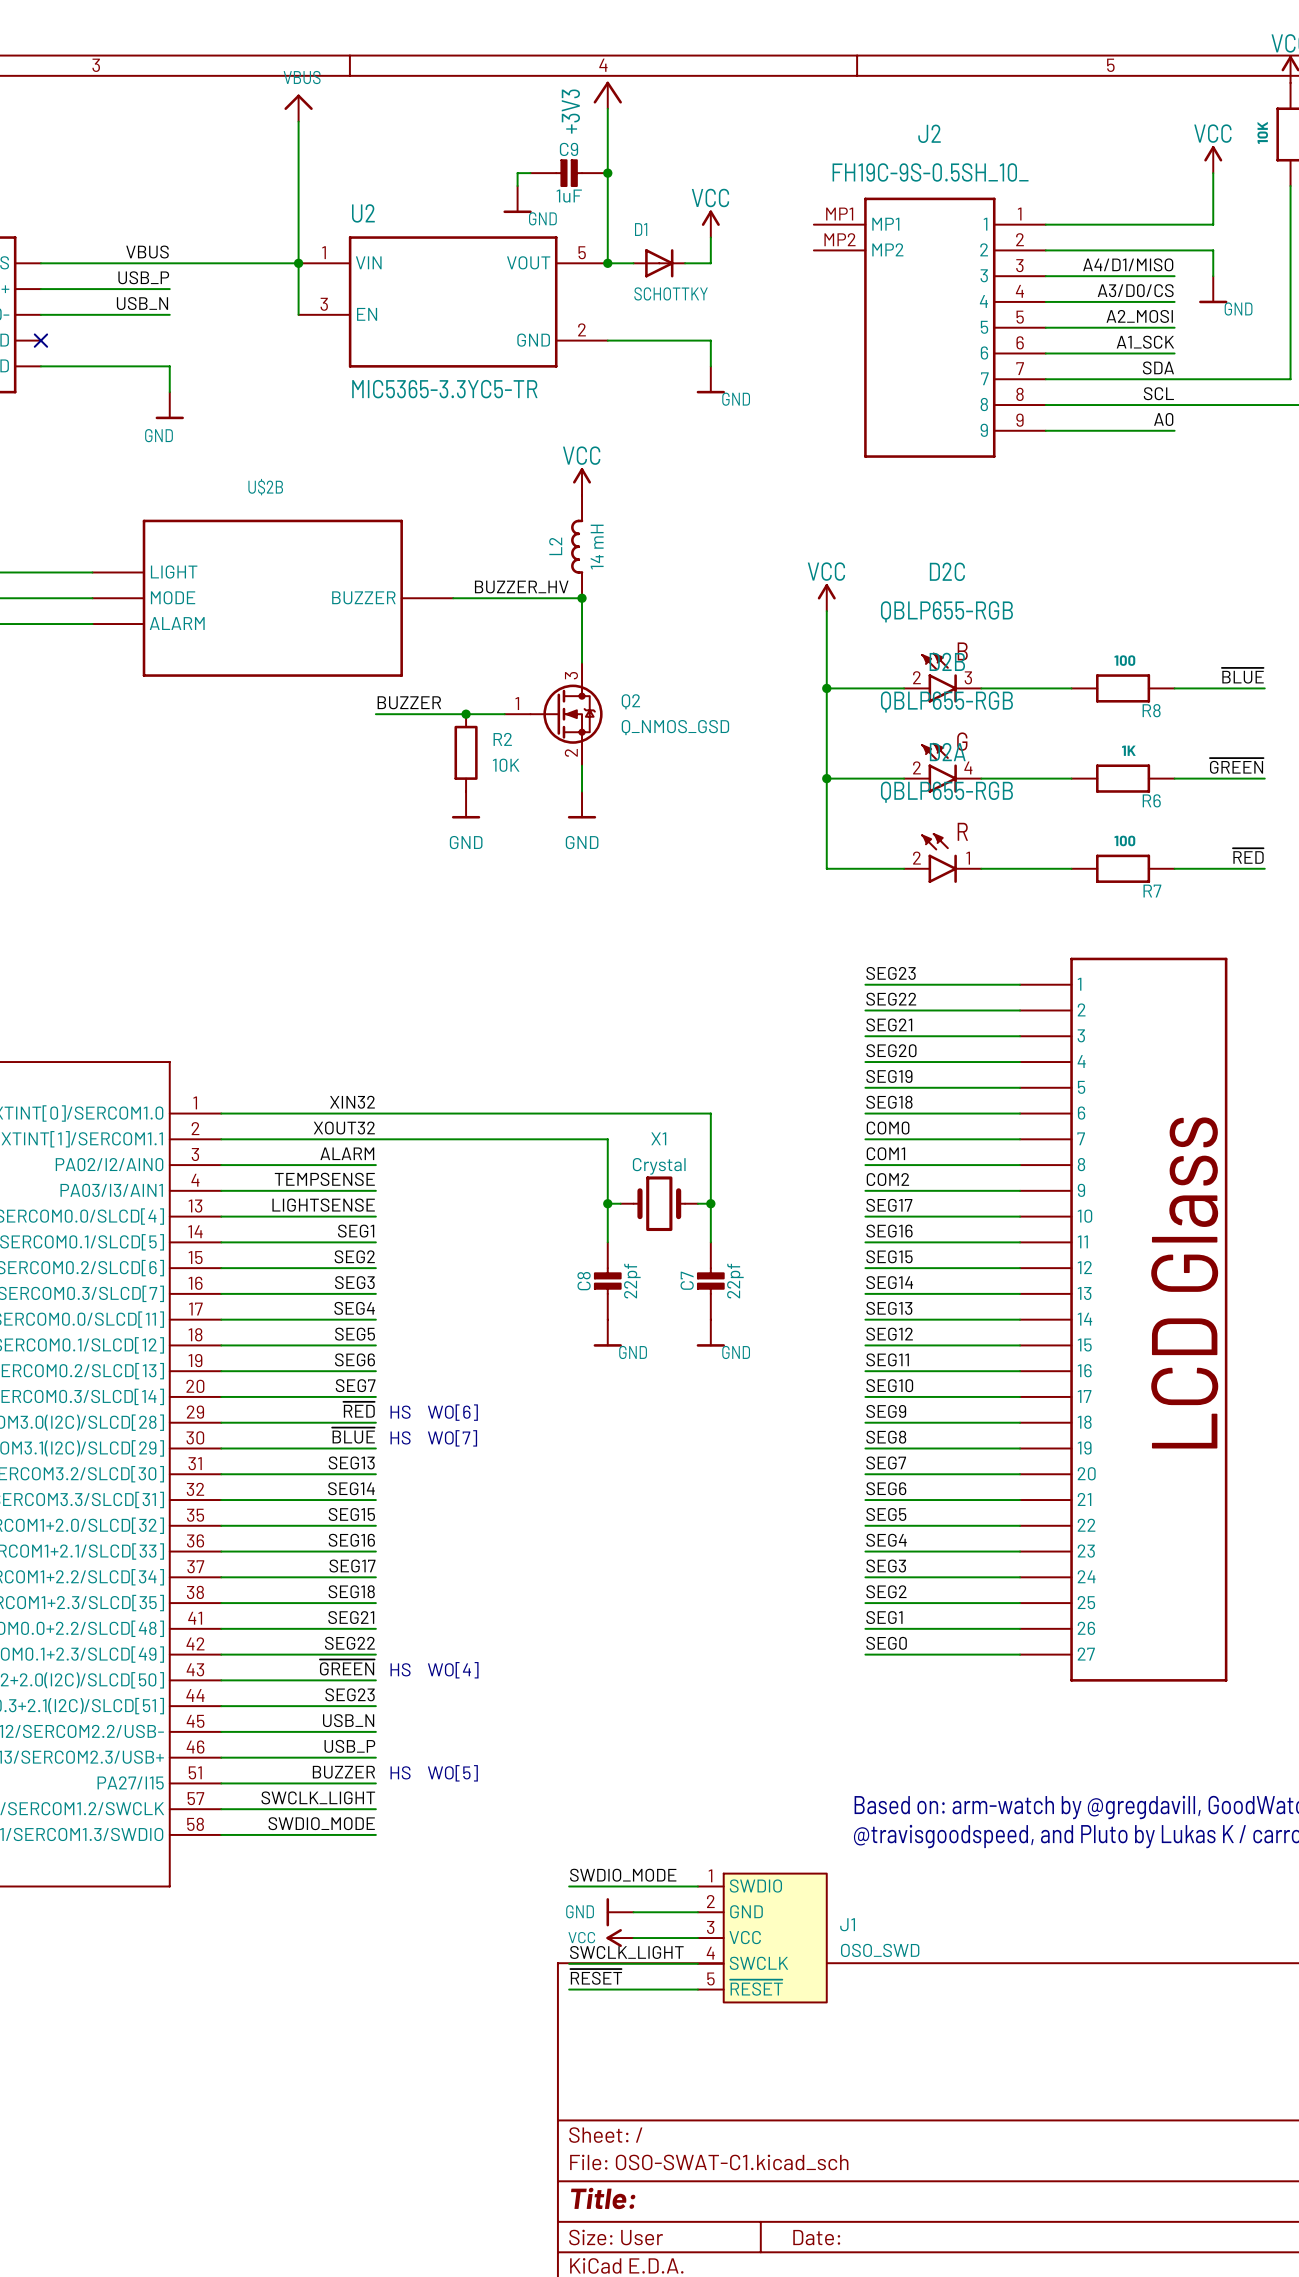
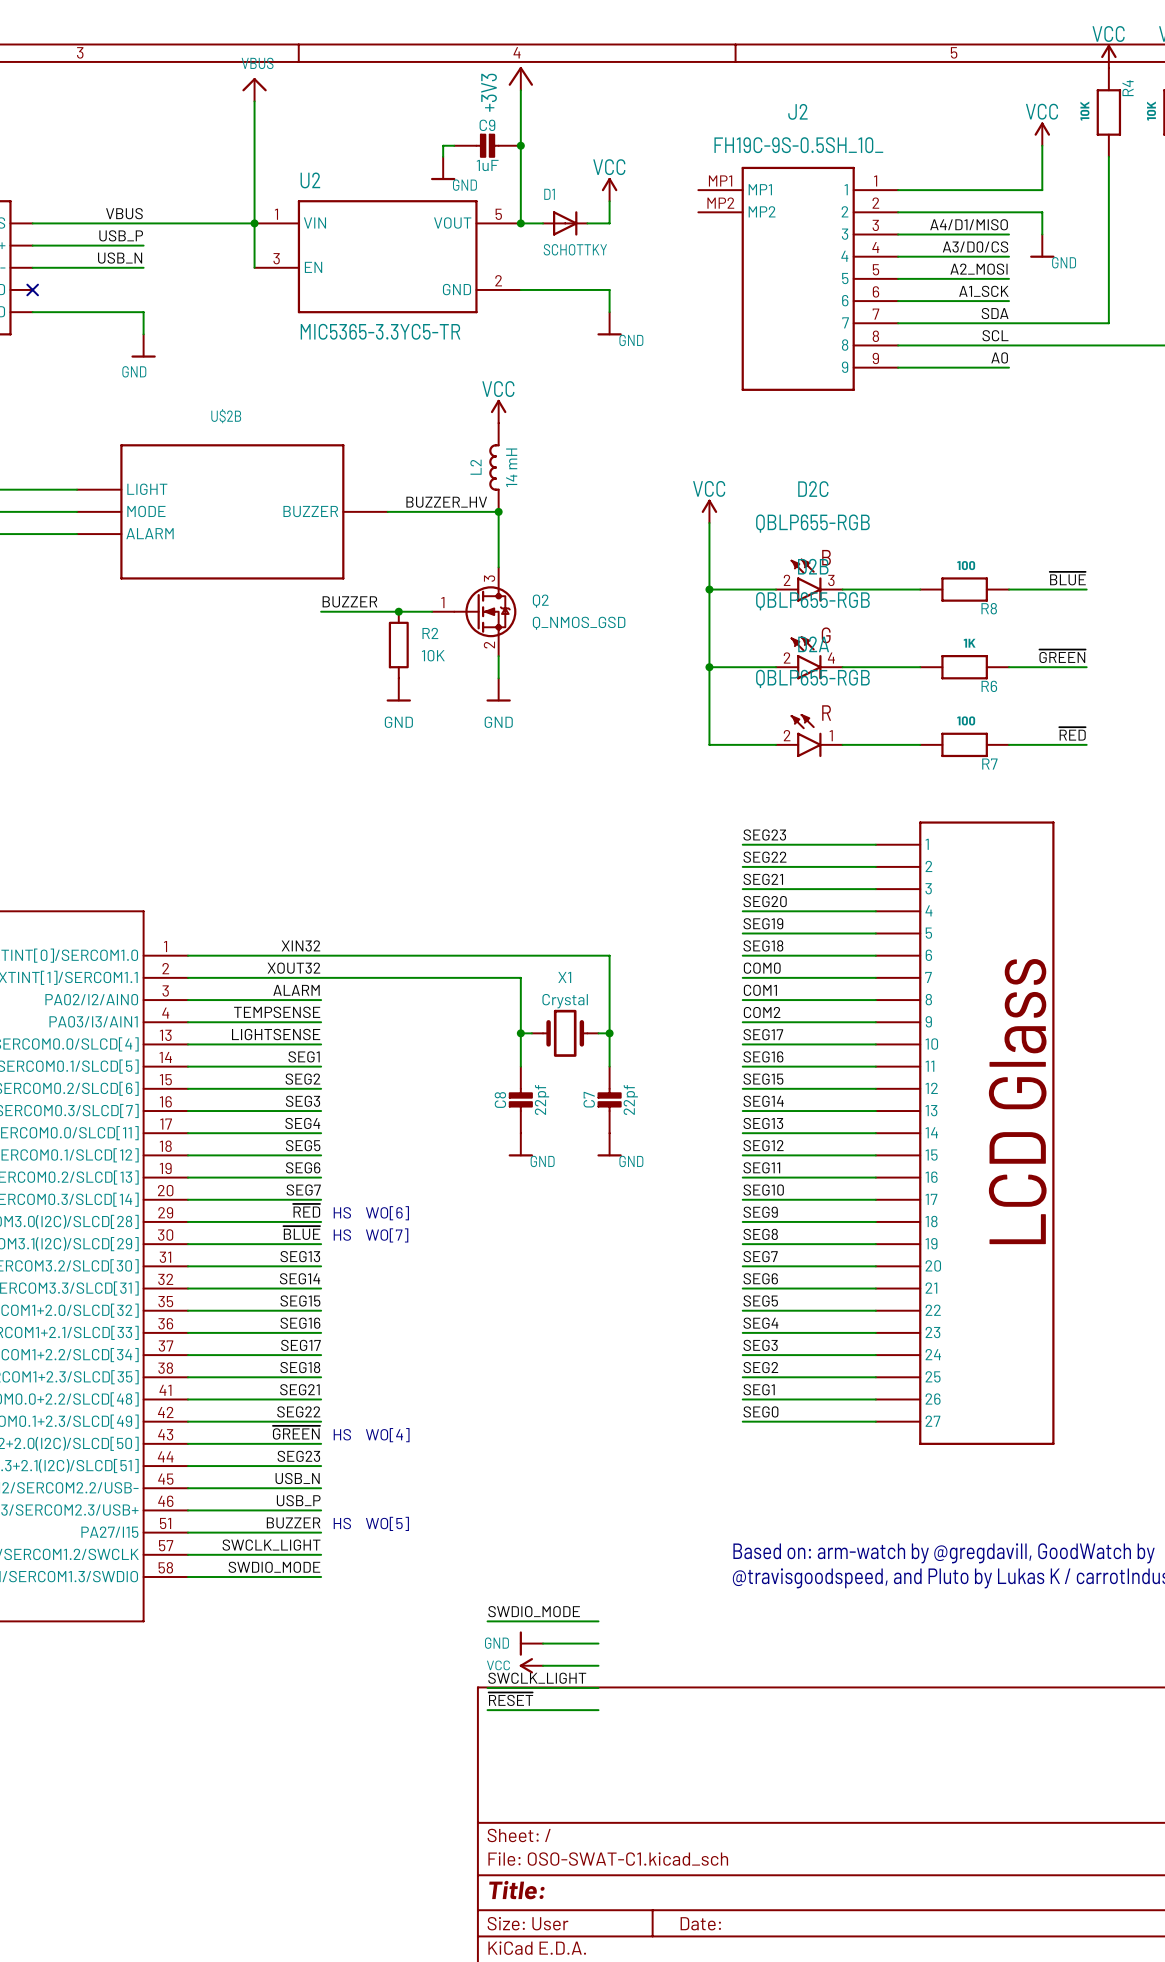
J1: OSO_SWD (762, 1938) -> none

